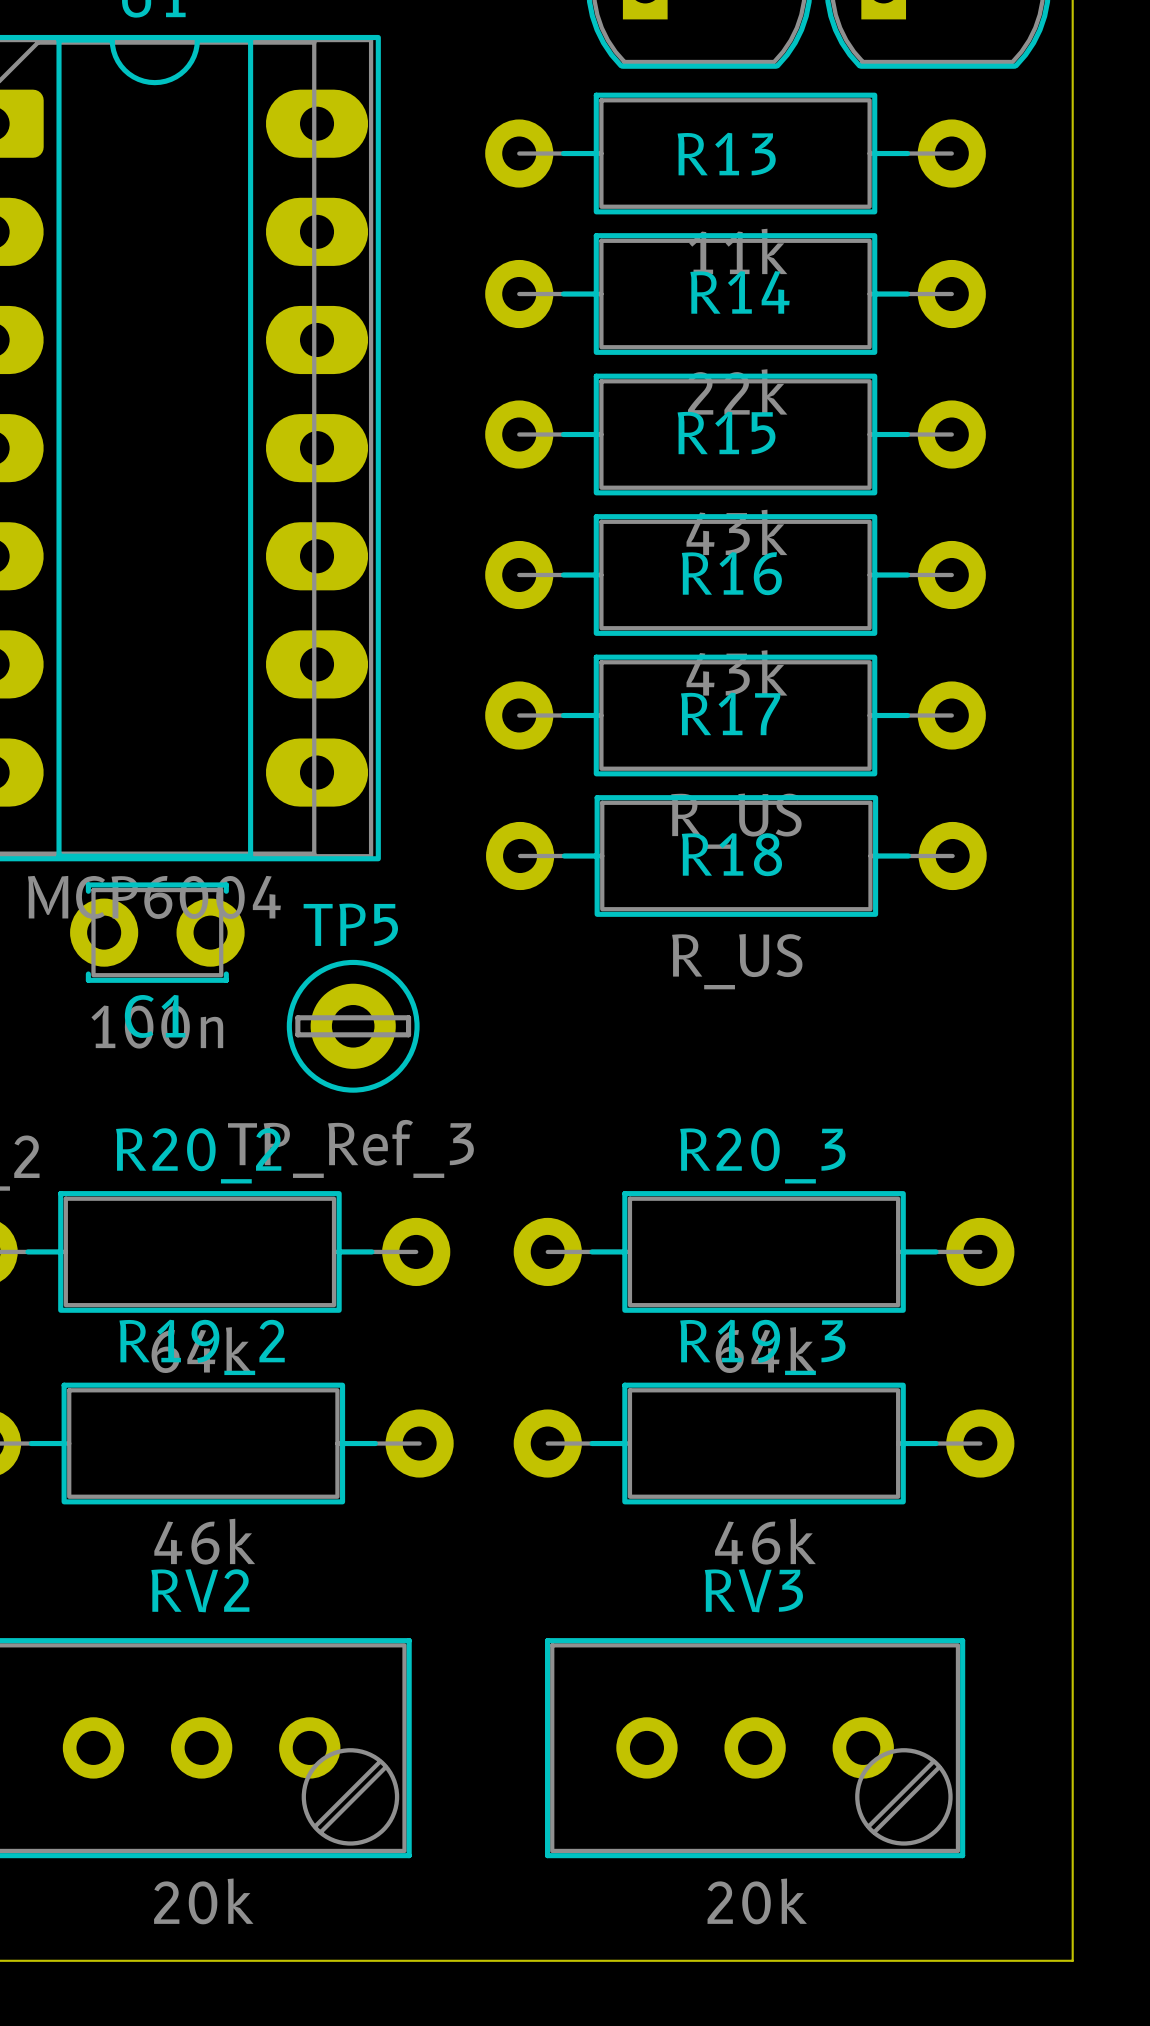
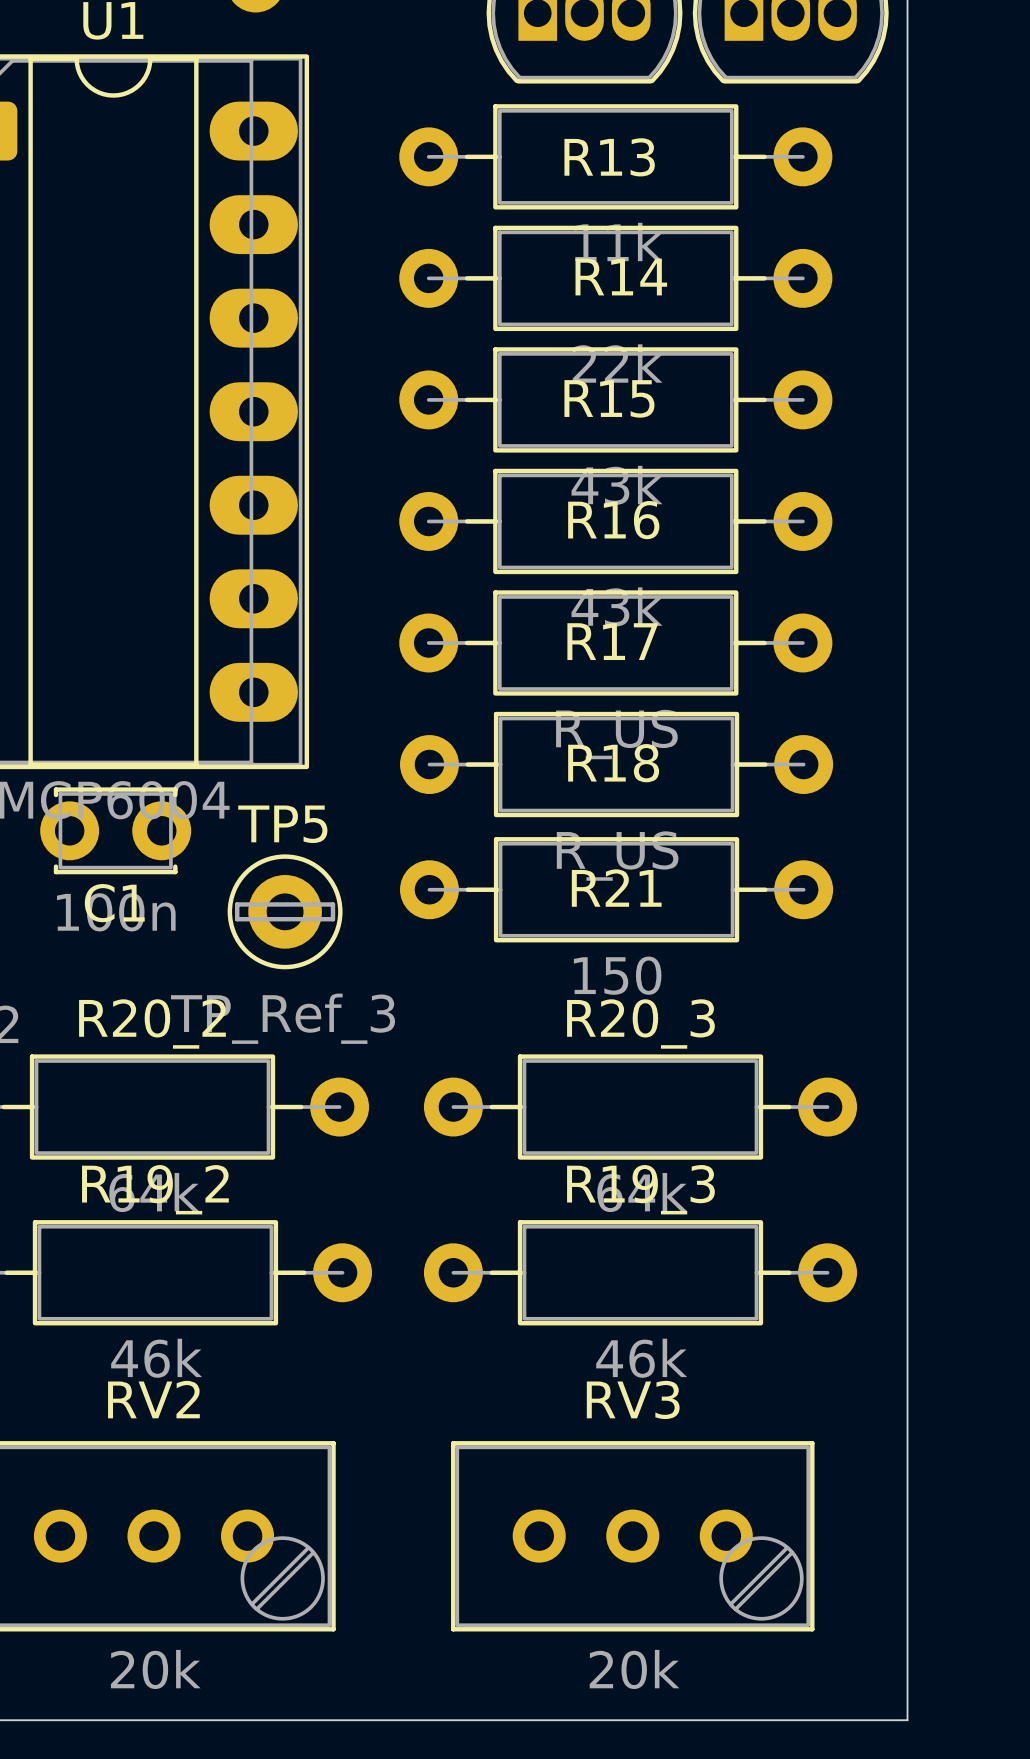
R21: none -> 150 (616, 889)

